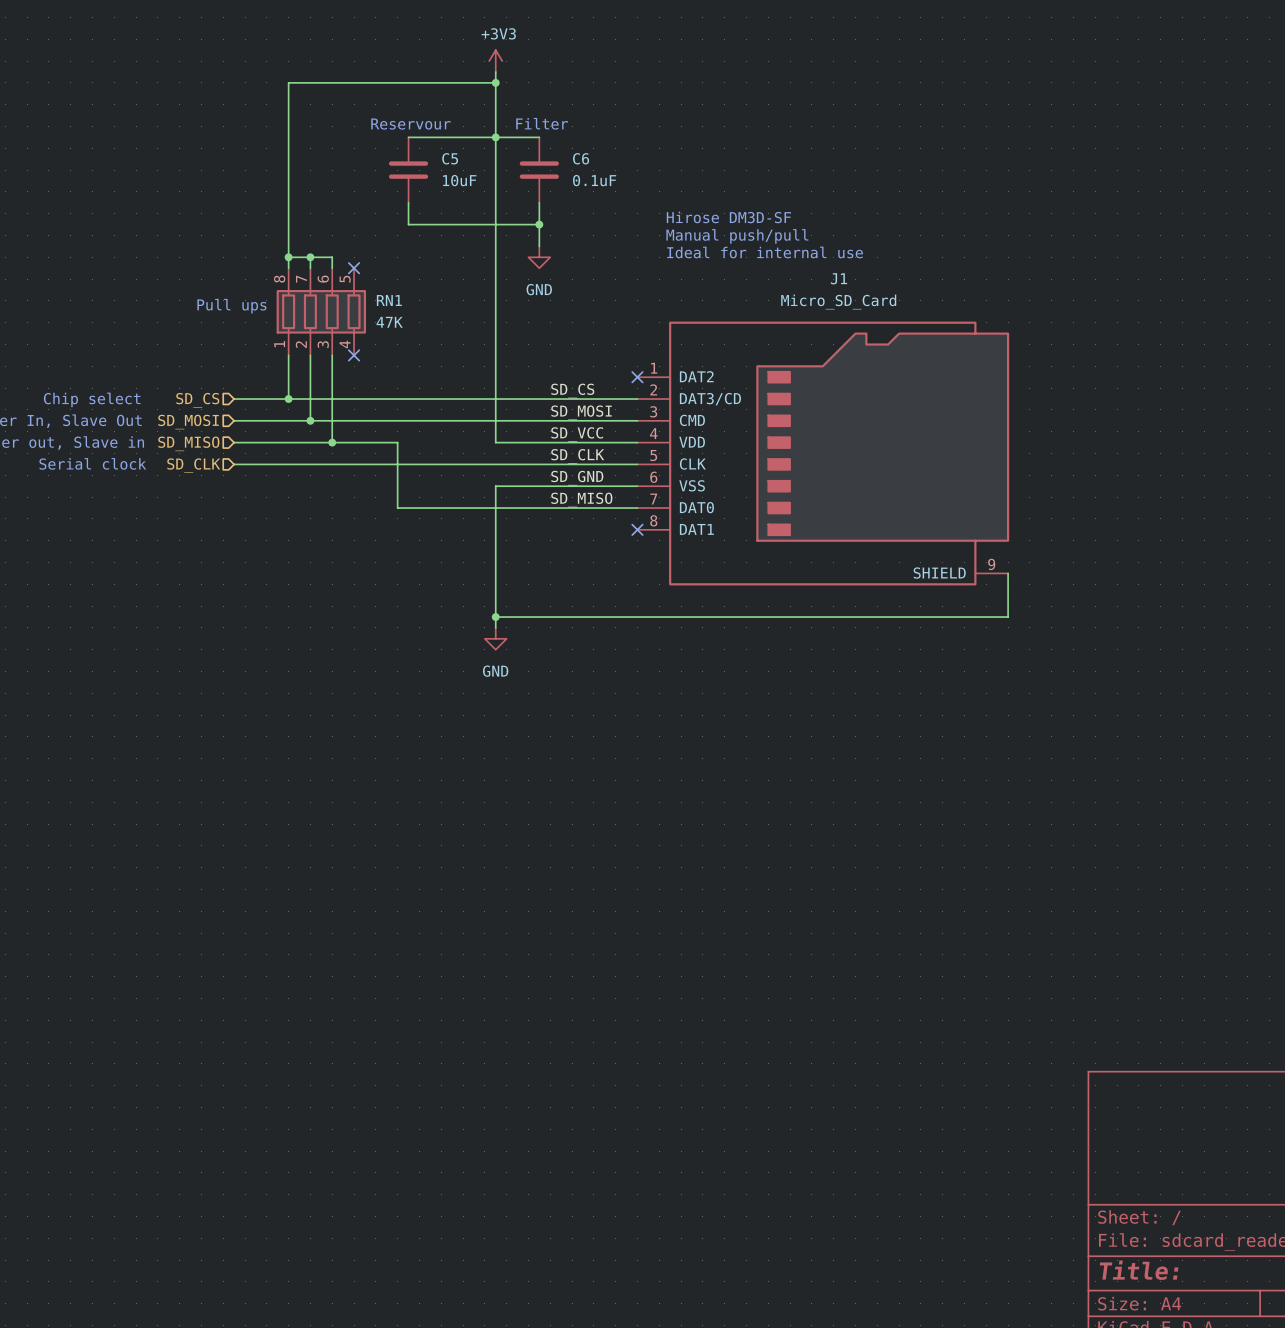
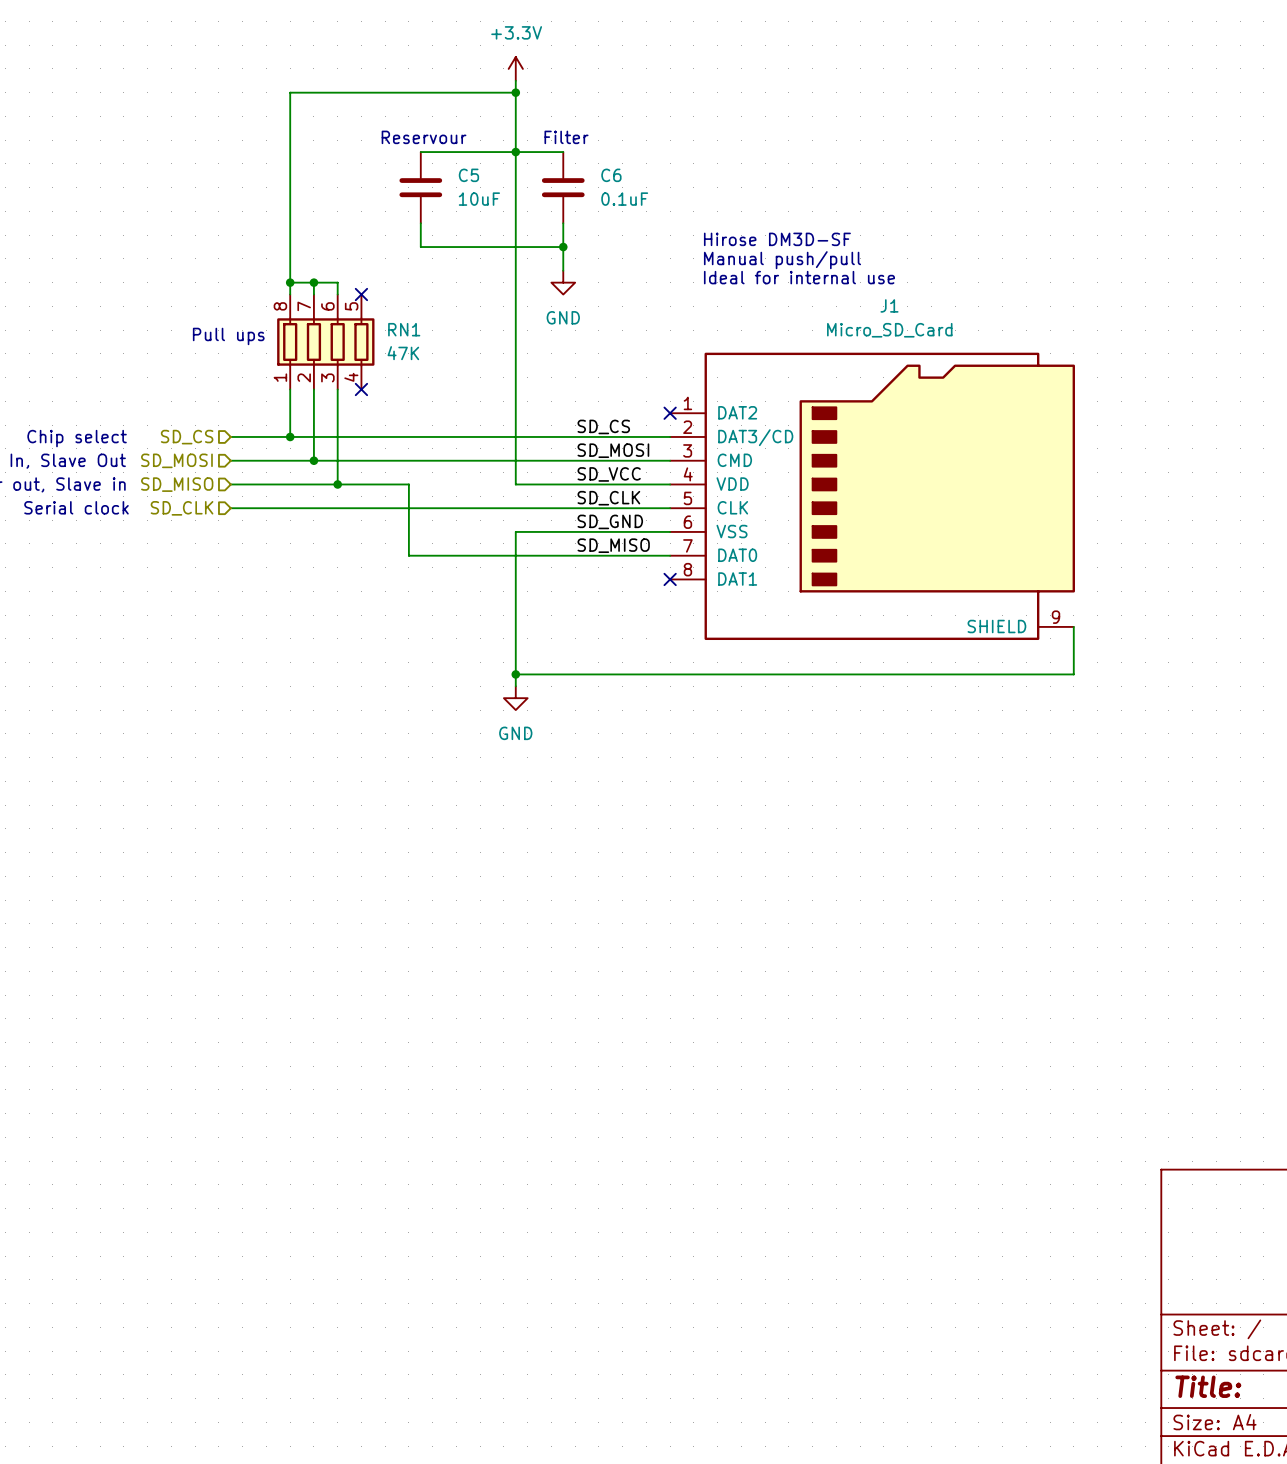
power symbol: +3V3 (495, 61) -> +3.3V (515, 68)

